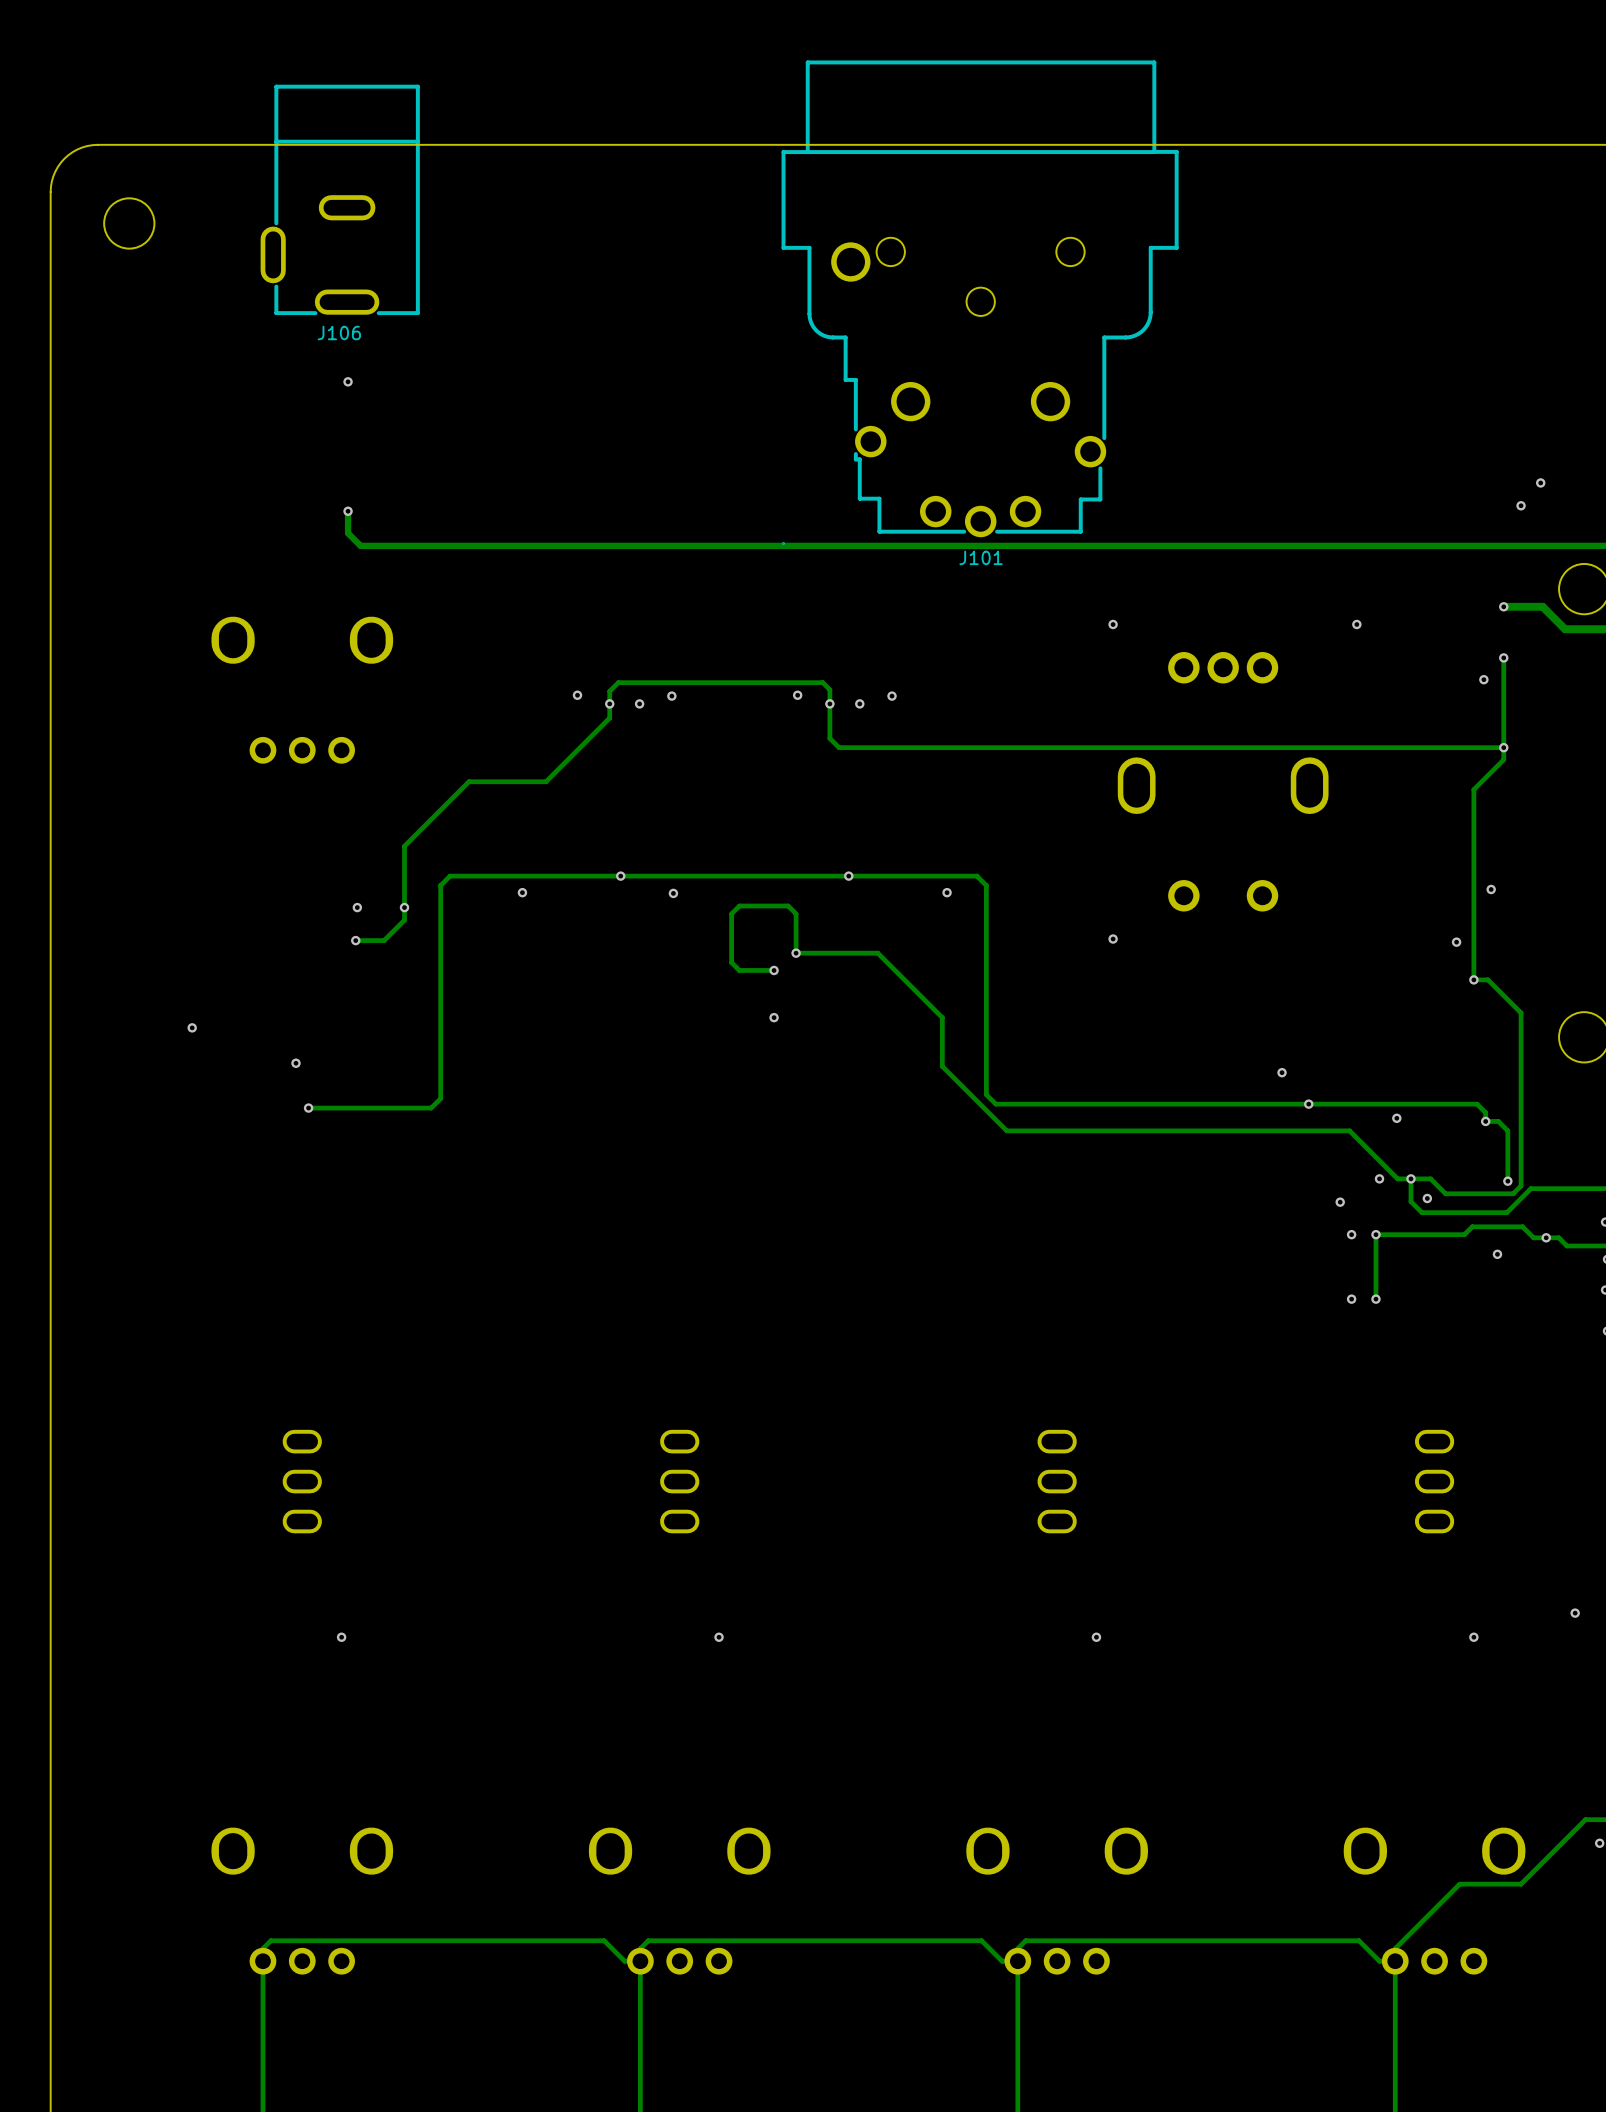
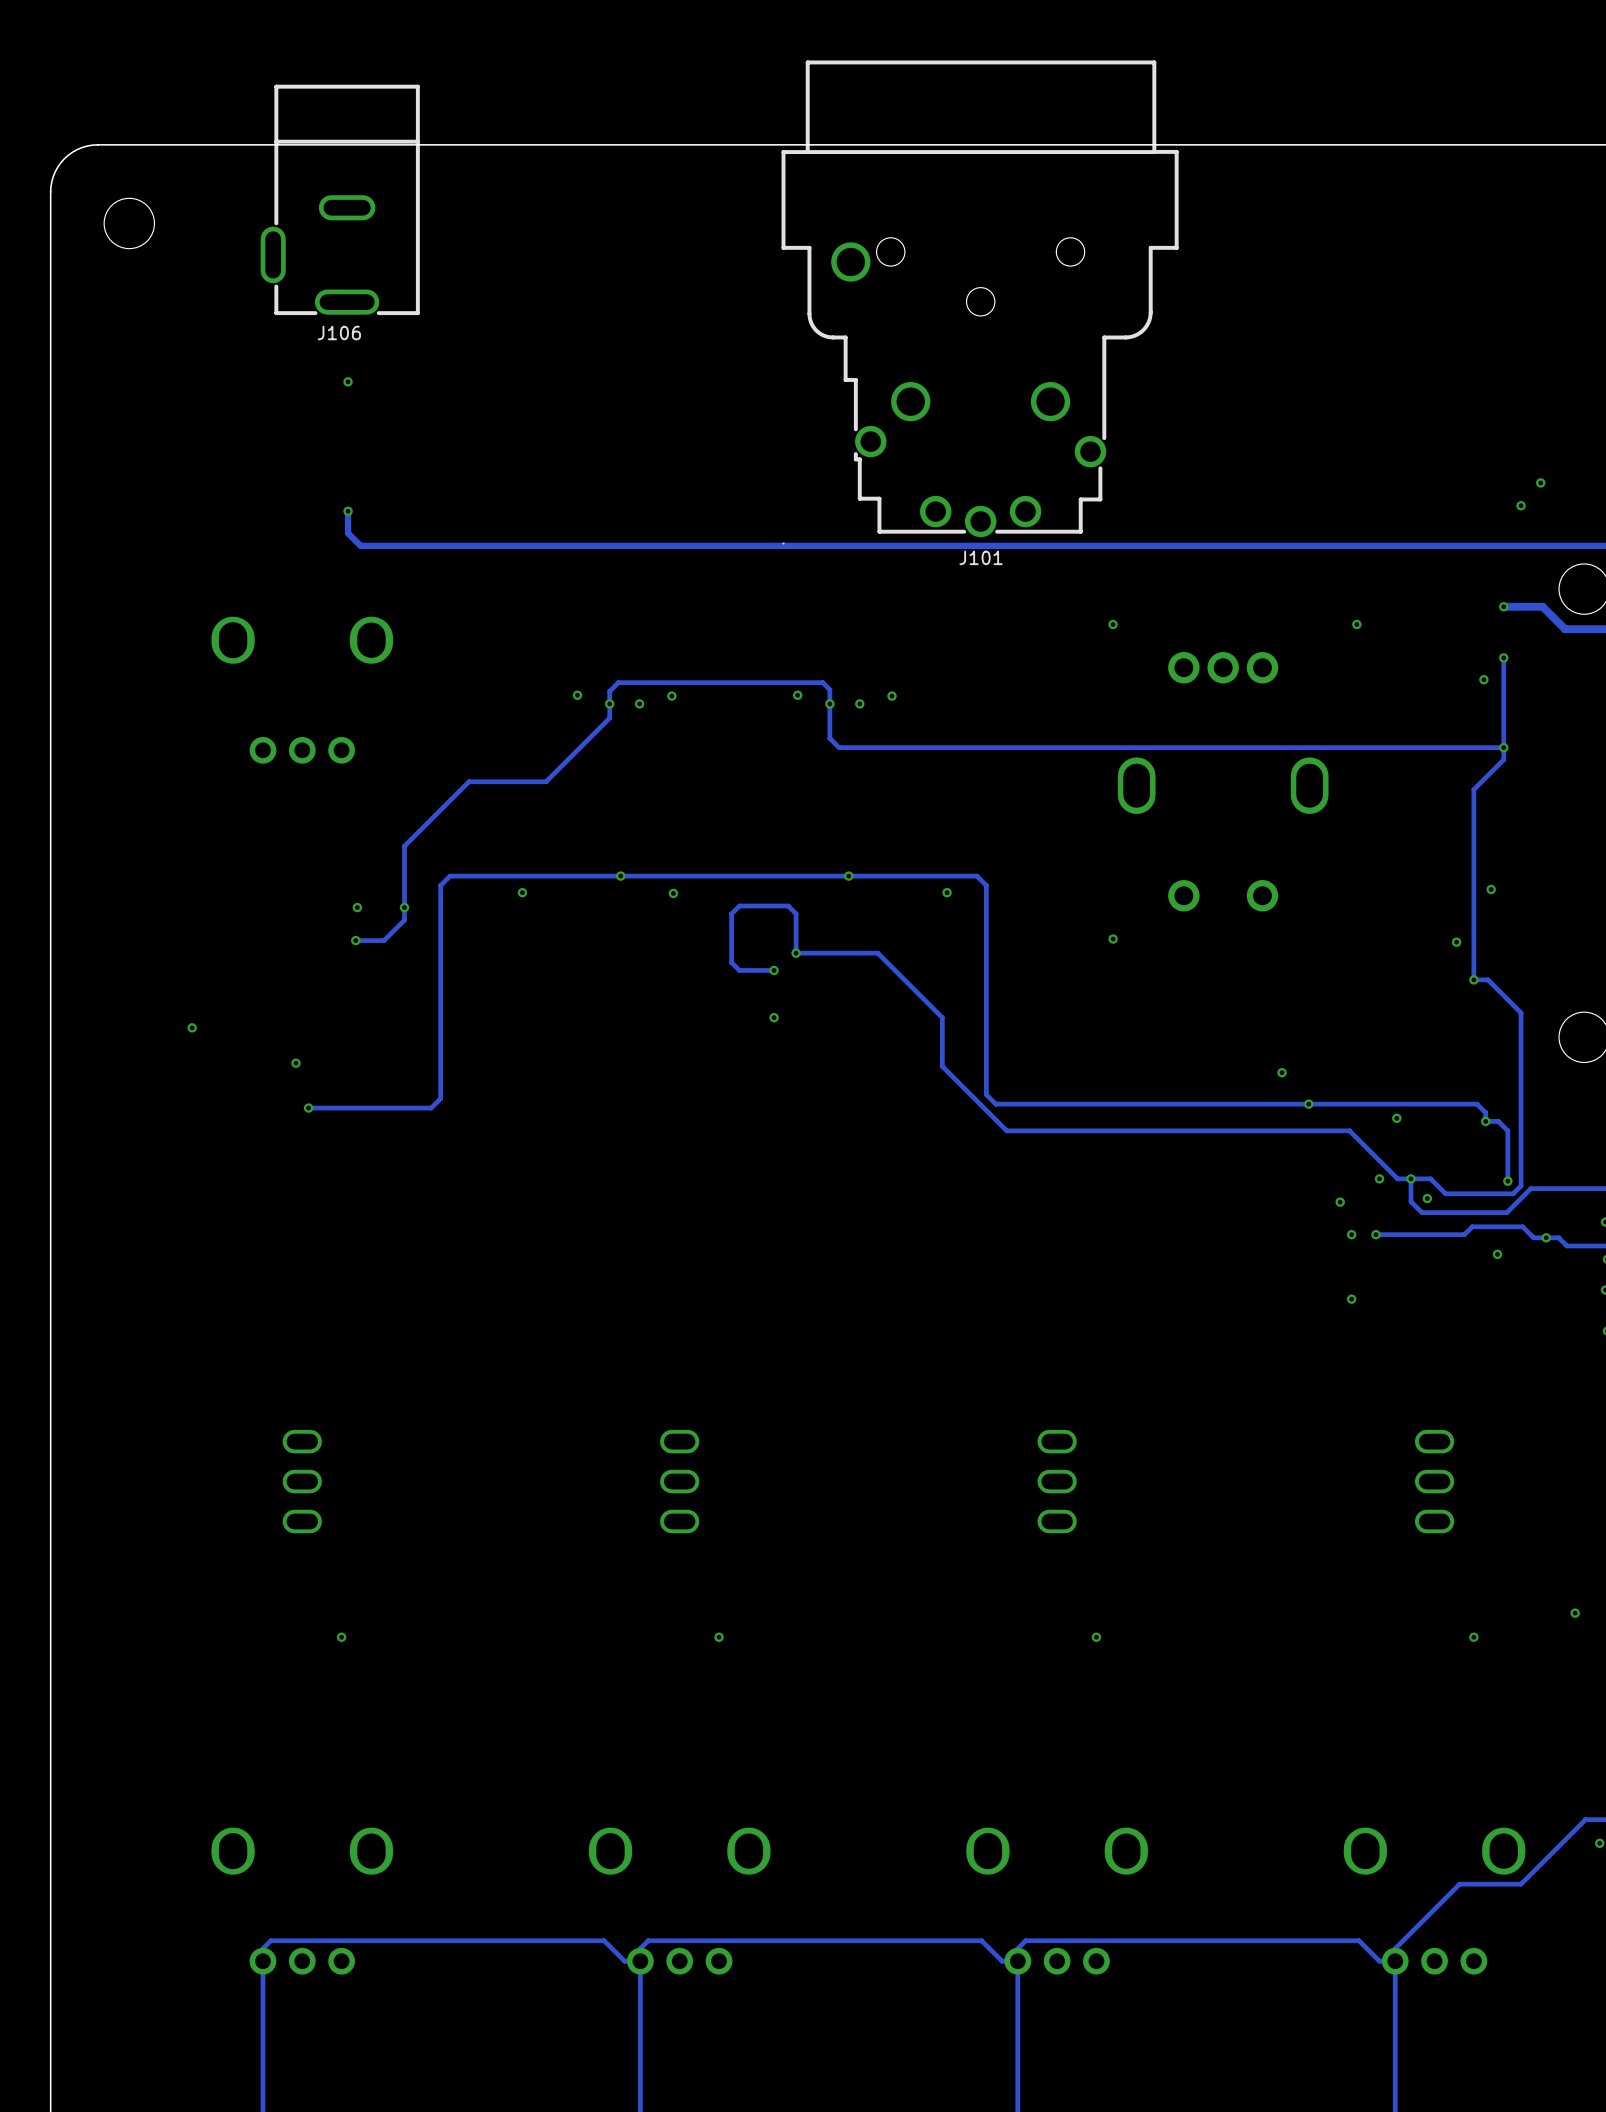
track: (1375, 1234) (1375, 1299) -> none
via: (1375, 1299) -> none

